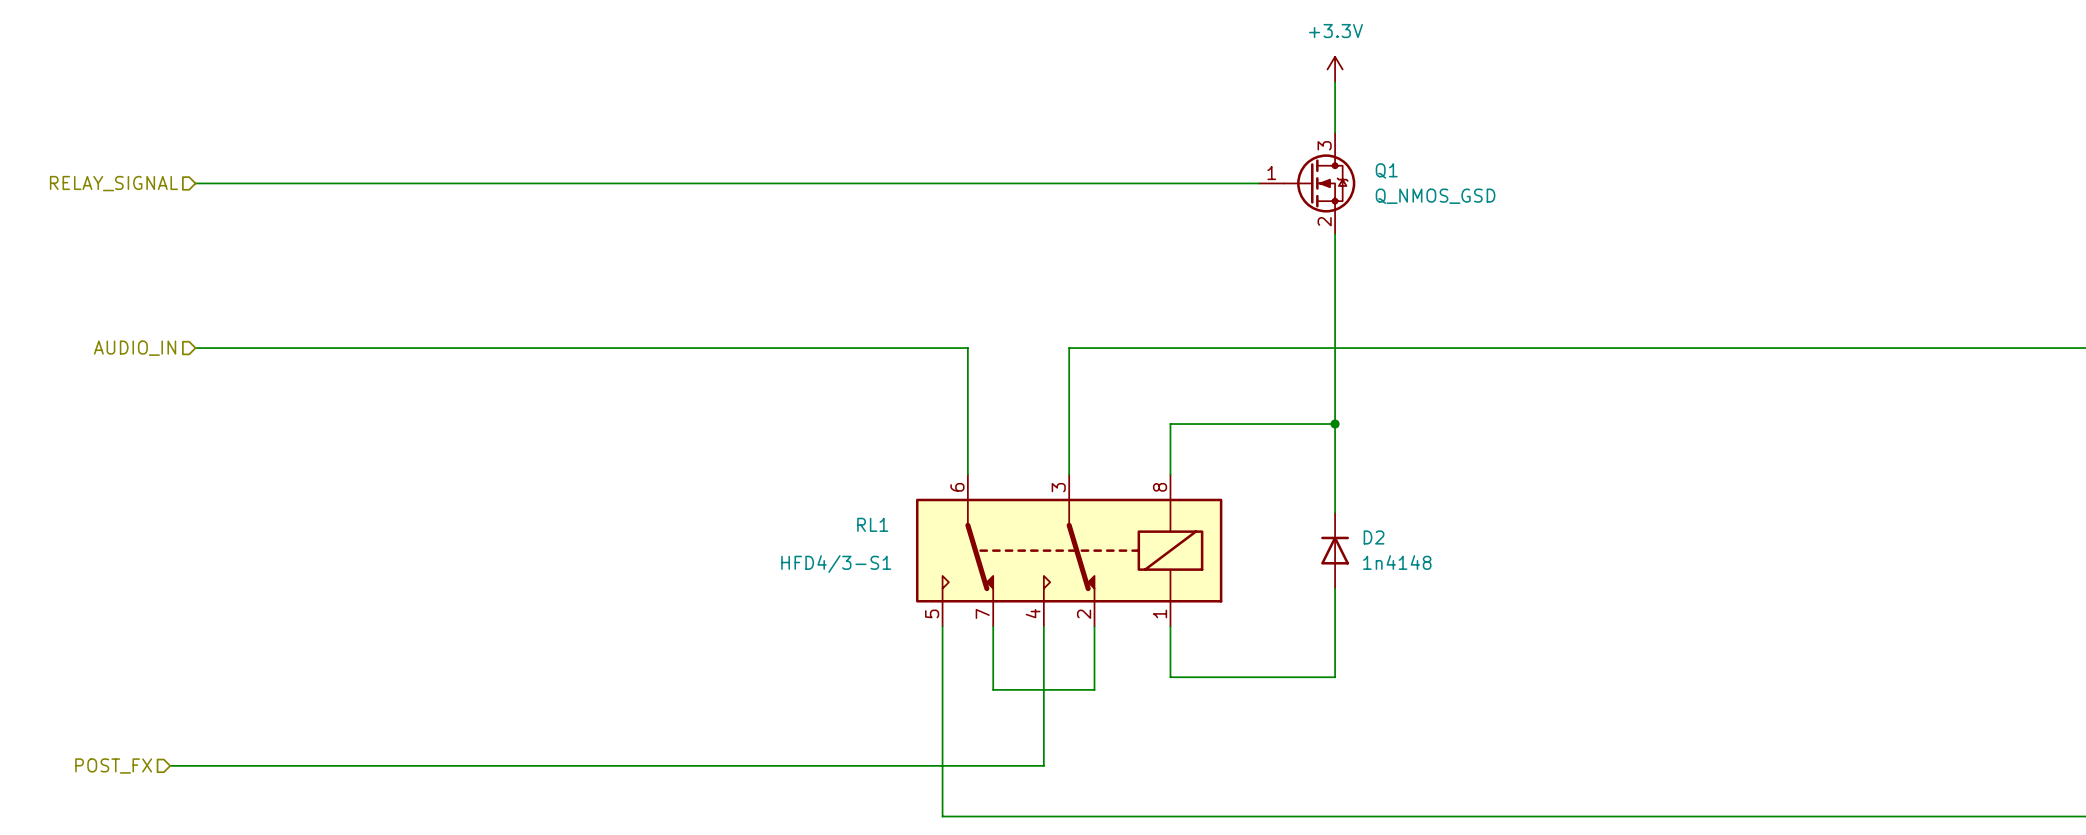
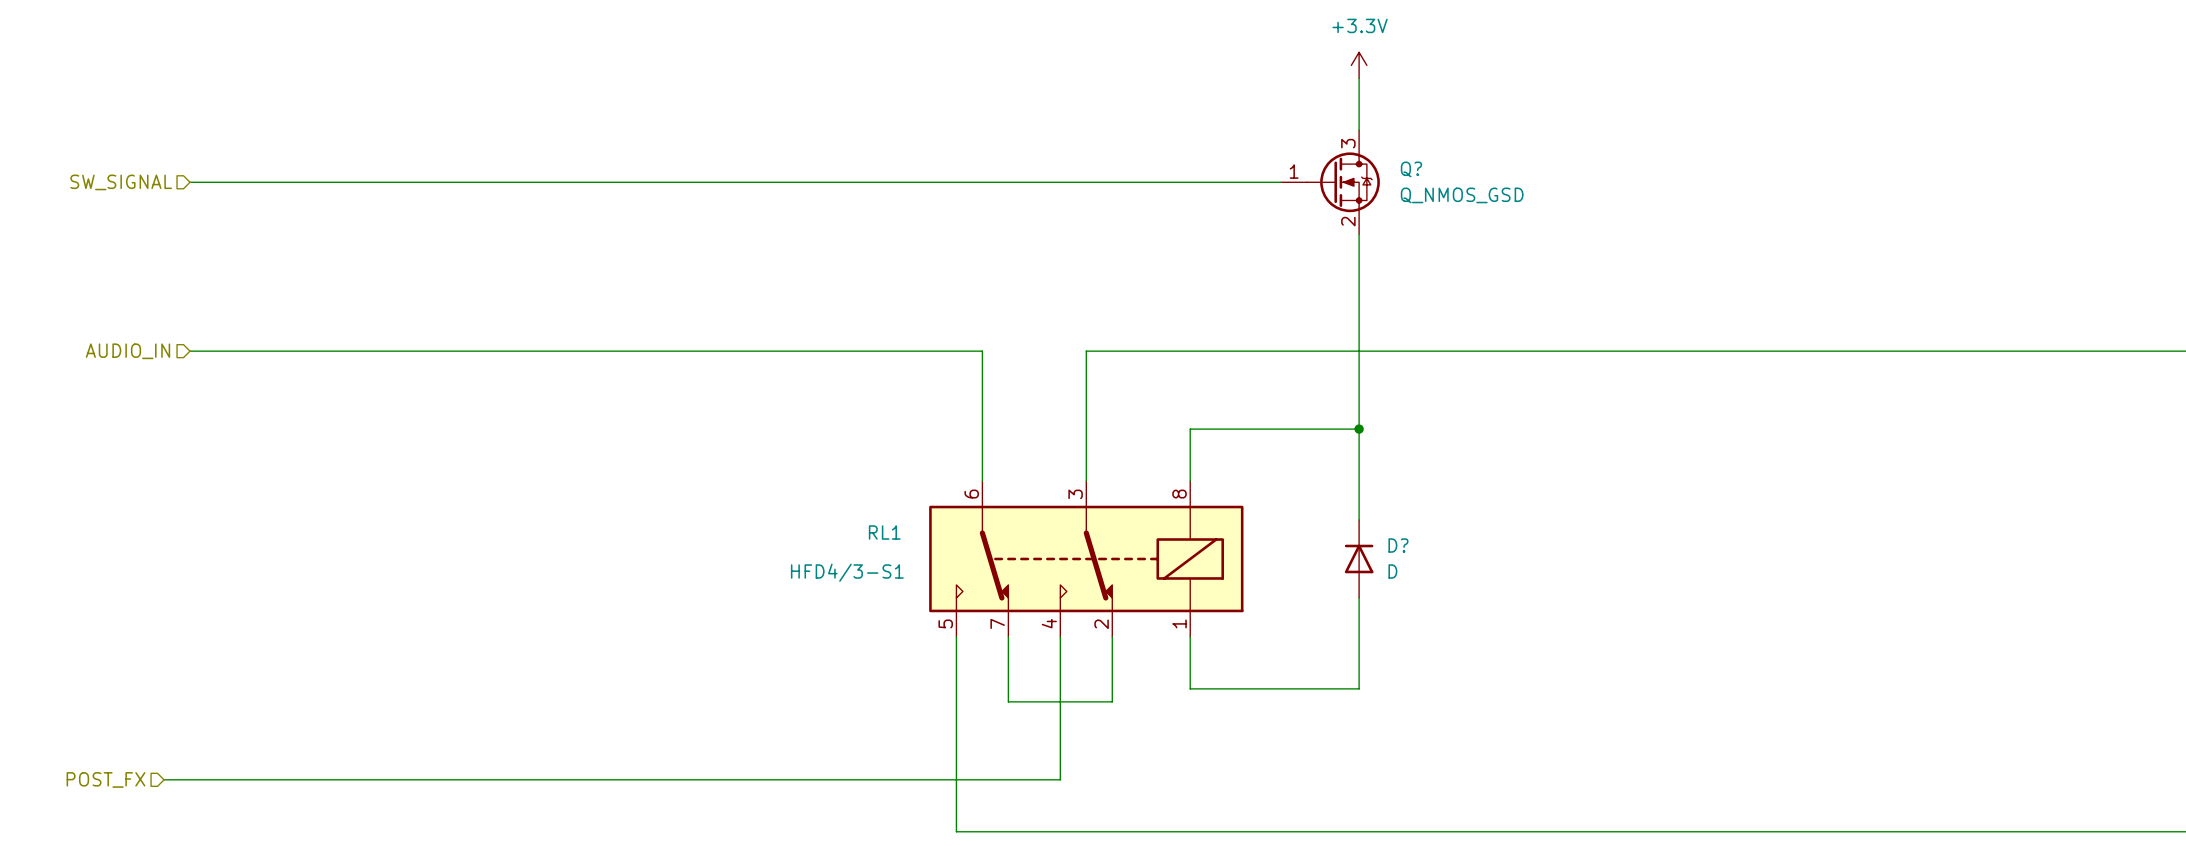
Q1 name: Q1 (1386, 170) -> Q? (1411, 169)
hierarchical label: RELAY_SIGNAL (113, 183) -> SW_SIGNAL (121, 182)
D2 name: D2 (1374, 537) -> D? (1398, 545)
D2 value: 1n4148 (1397, 562) -> D (1392, 571)

